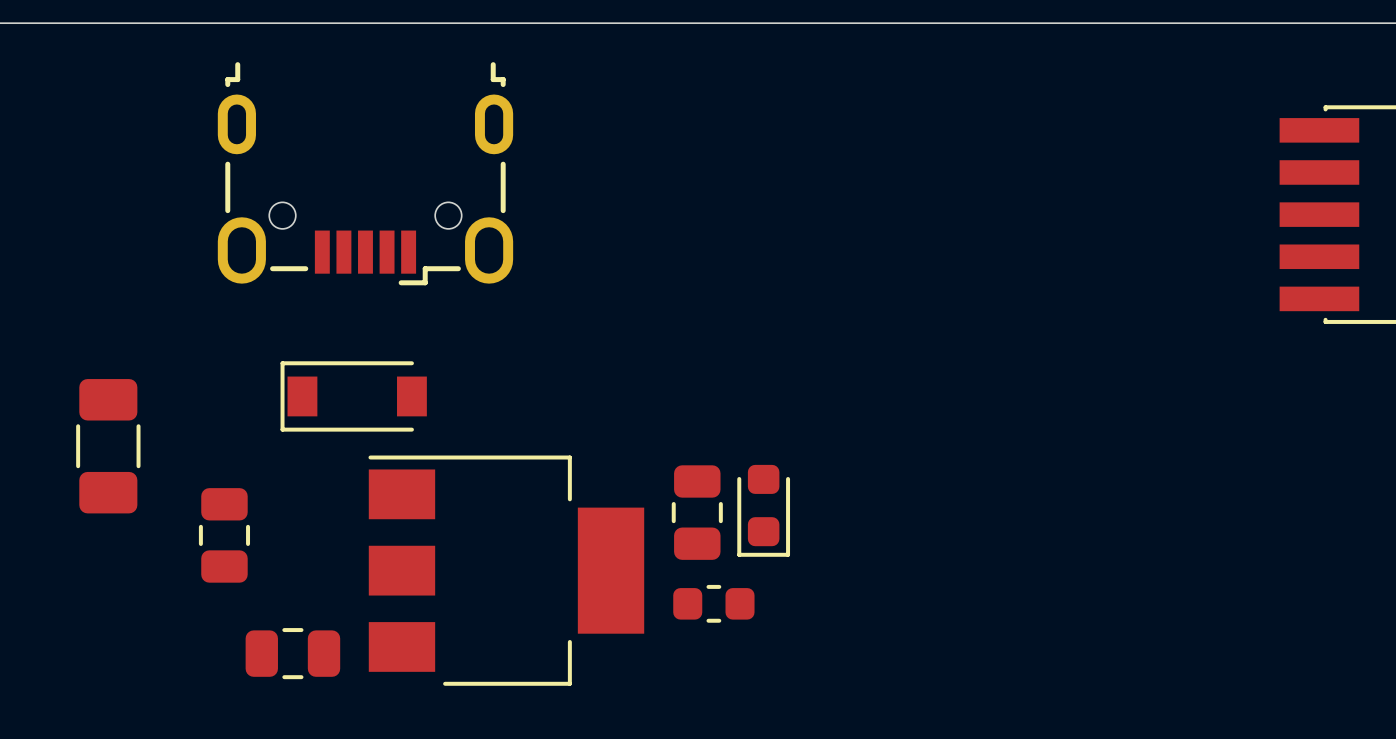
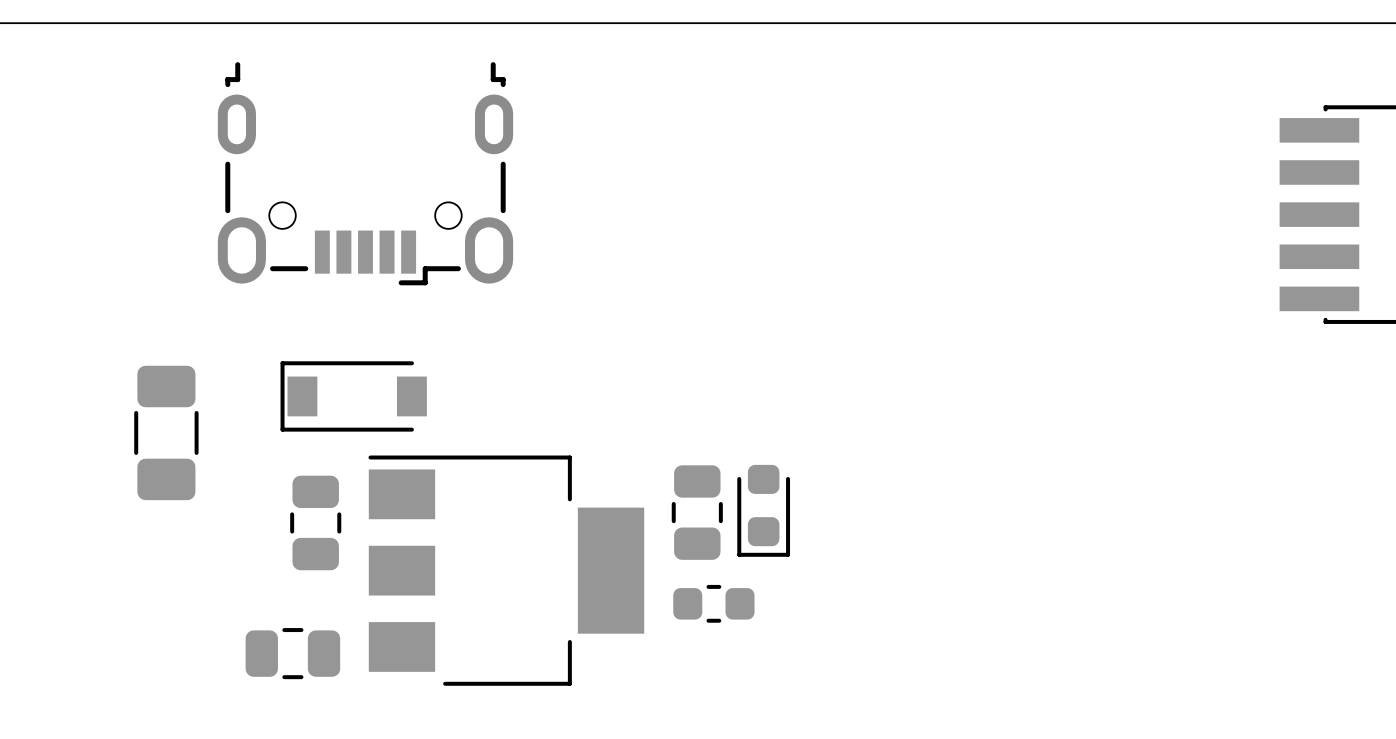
part position: (108, 446) -> (166, 432)
part position: (224, 535) -> (315, 522)

